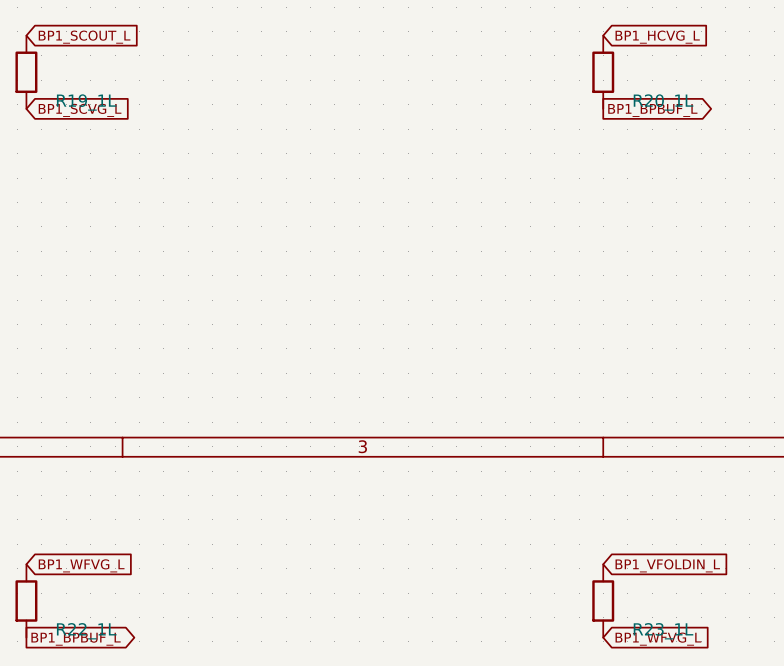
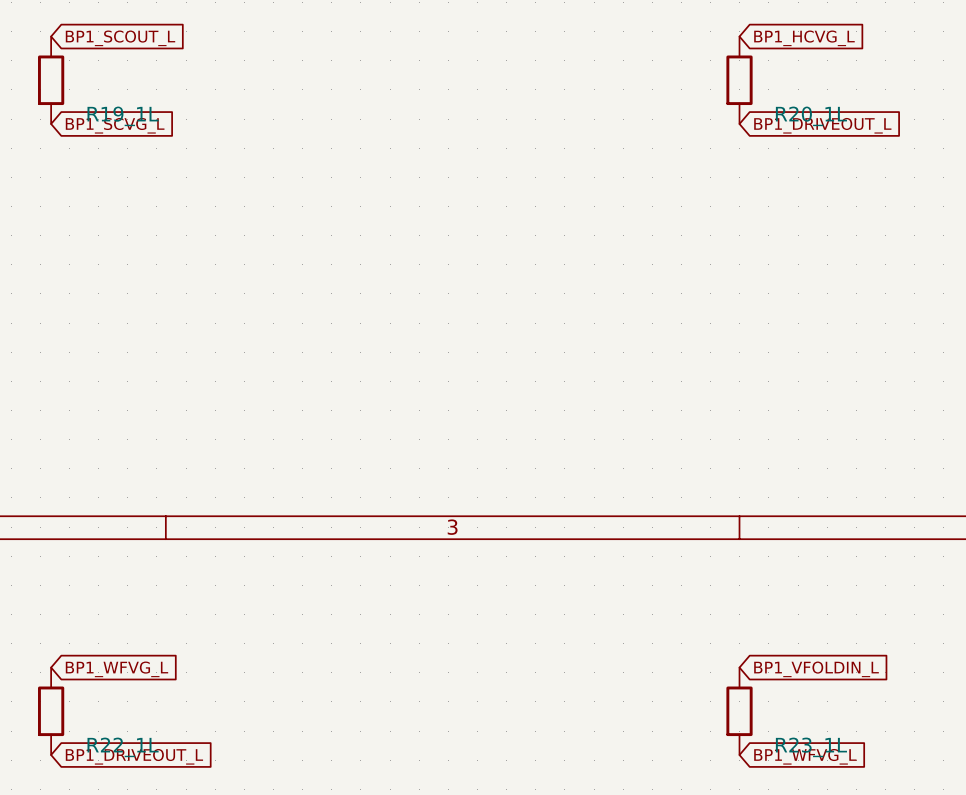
global label shape: output (652, 110) -> input (822, 125)
global label: BP1_BPBUF_L (652, 110) -> BP1_DRIVEOUT_L (822, 125)
global label shape: output (76, 639) -> input (134, 756)
global label: BP1_BPBUF_L (76, 639) -> BP1_DRIVEOUT_L (134, 756)

